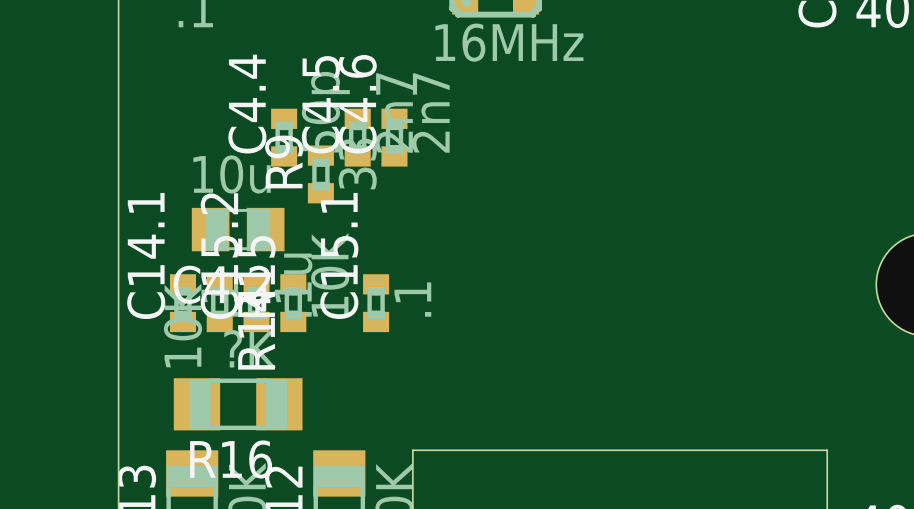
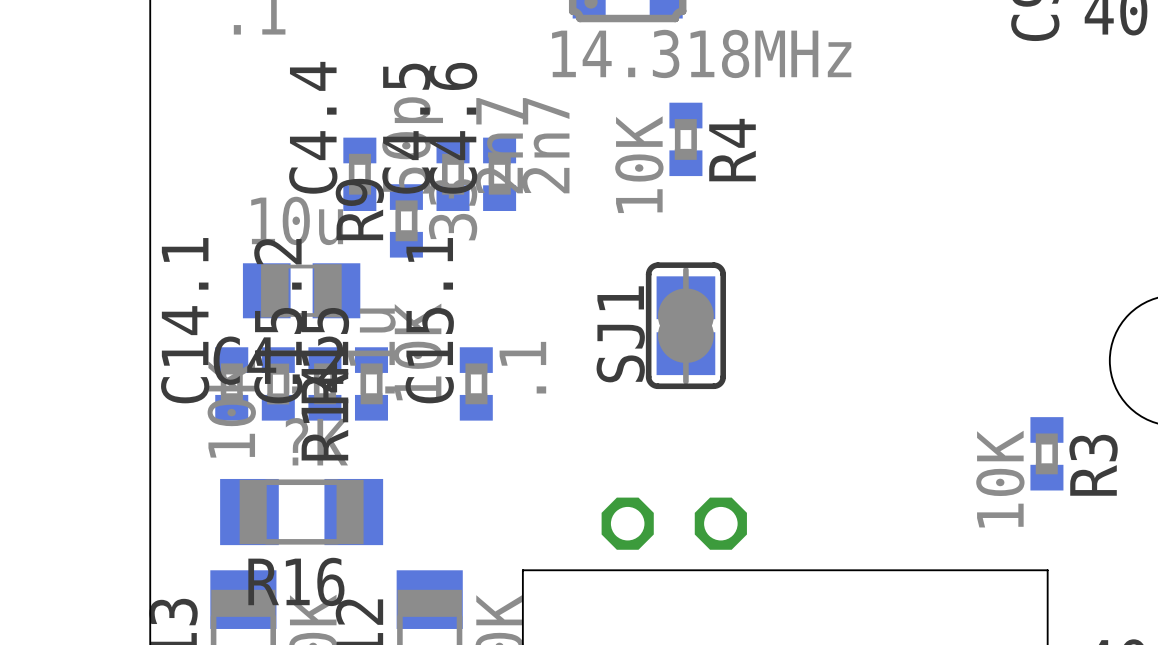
part value: 16MHz (509, 42) -> 14.318MHz (701, 53)
R4: none -> 10K (685, 139)
SJ1: none -> (685, 325)
R3: none -> 10K (1046, 453)
part: none -> (674, 523)

